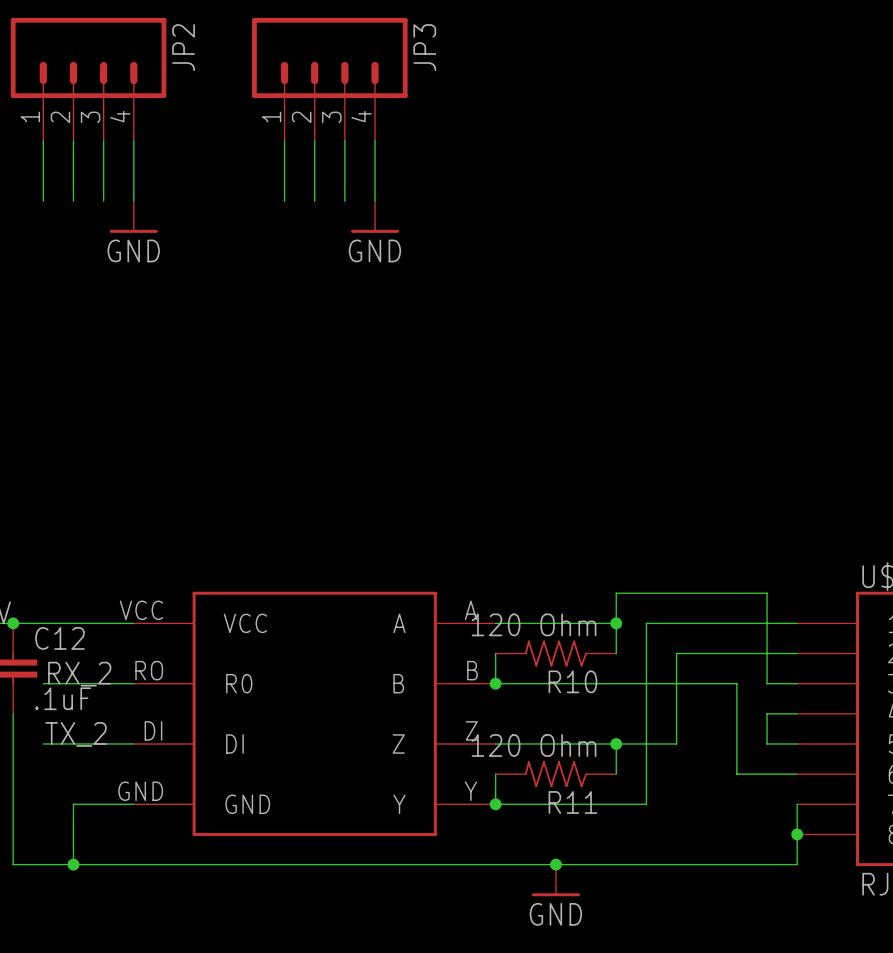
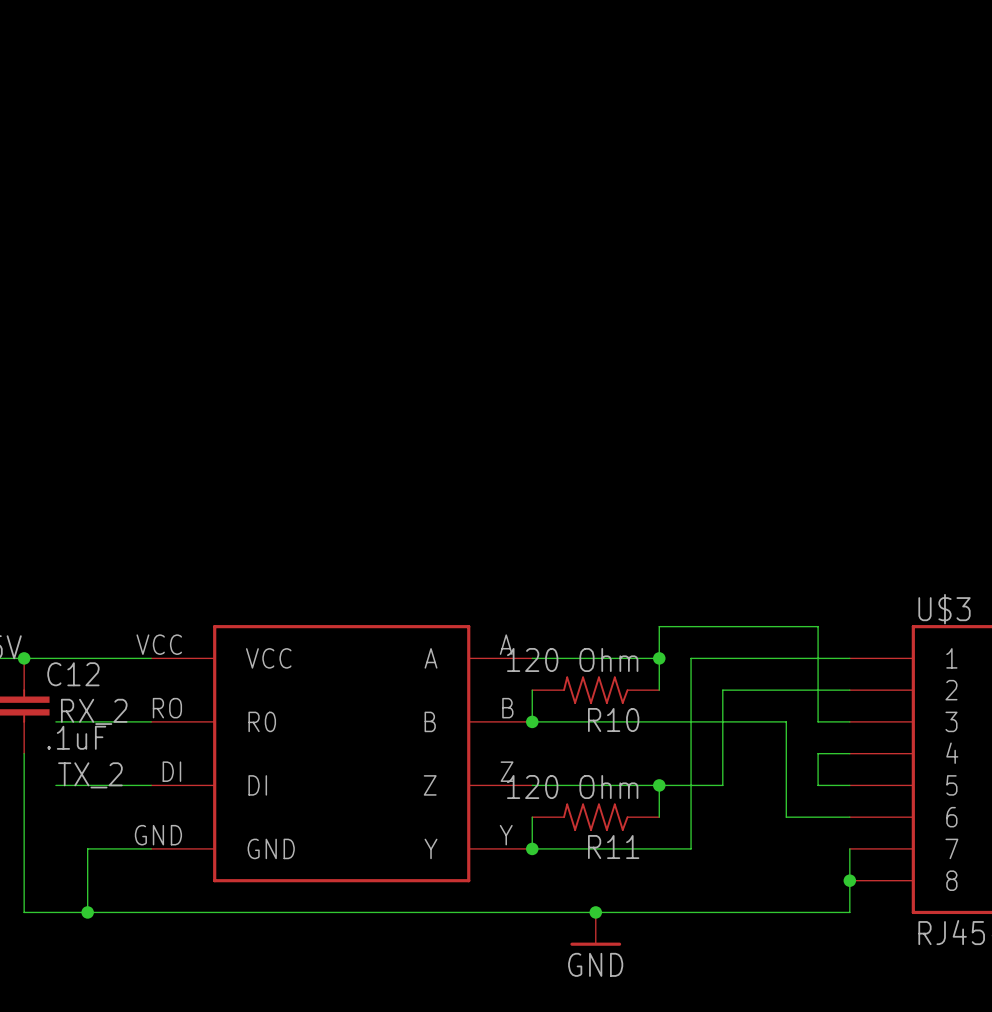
JP2: (88, 79) -> none
JP3: (329, 79) -> none
wire: (43, 140) (43, 201) -> none
wire: (73, 140) (73, 201) -> none
wire: (103, 140) (103, 201) -> none
wire: (133, 140) (133, 201) -> none
wire: (284, 140) (284, 201) -> none
wire: (314, 140) (314, 201) -> none
wire: (344, 140) (344, 201) -> none
wire: (375, 140) (375, 201) -> none
power symbol: GND (133, 217) -> none
power symbol: GND (375, 217) -> none

